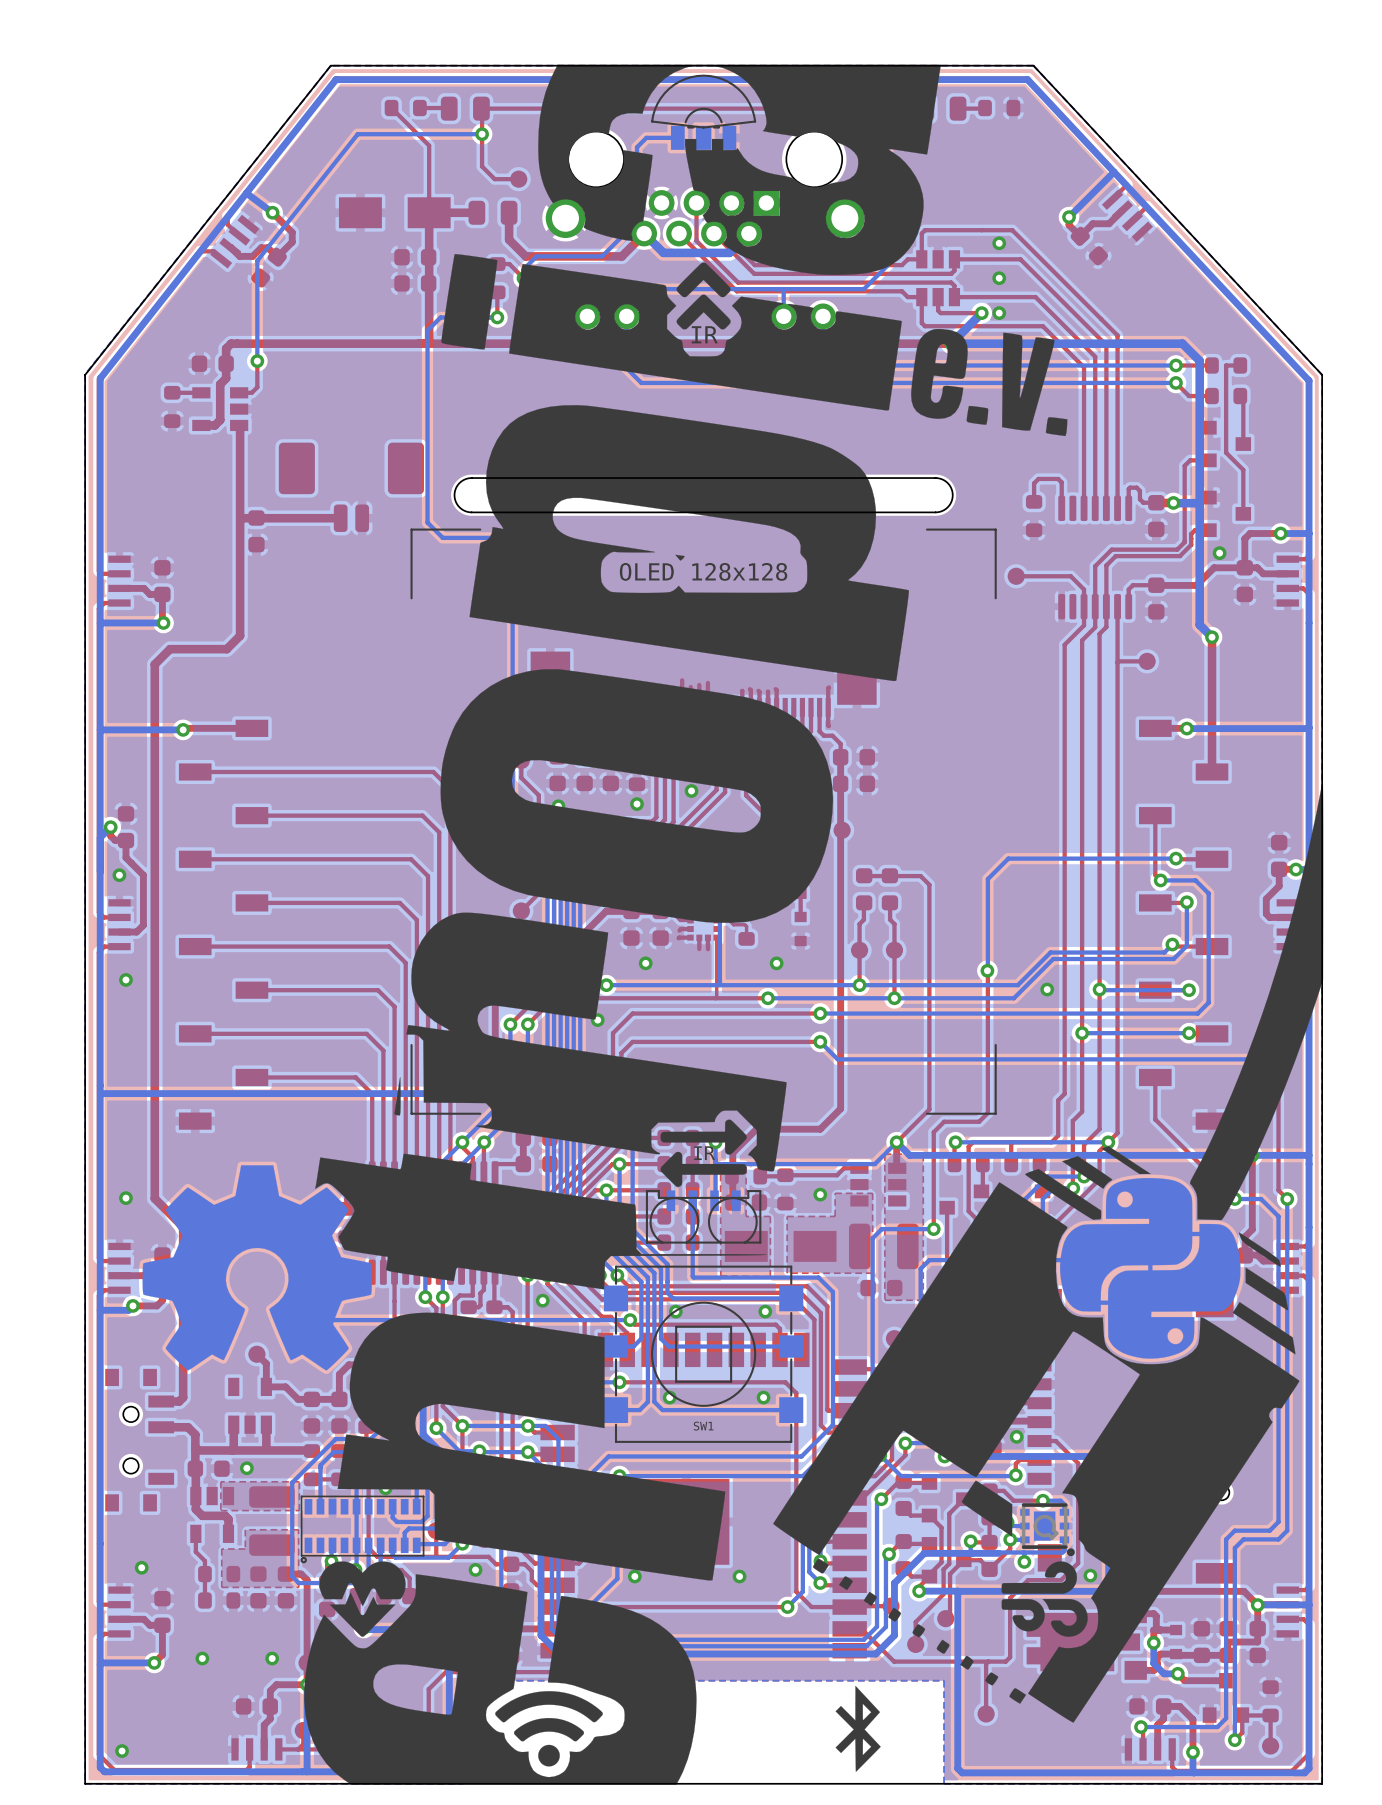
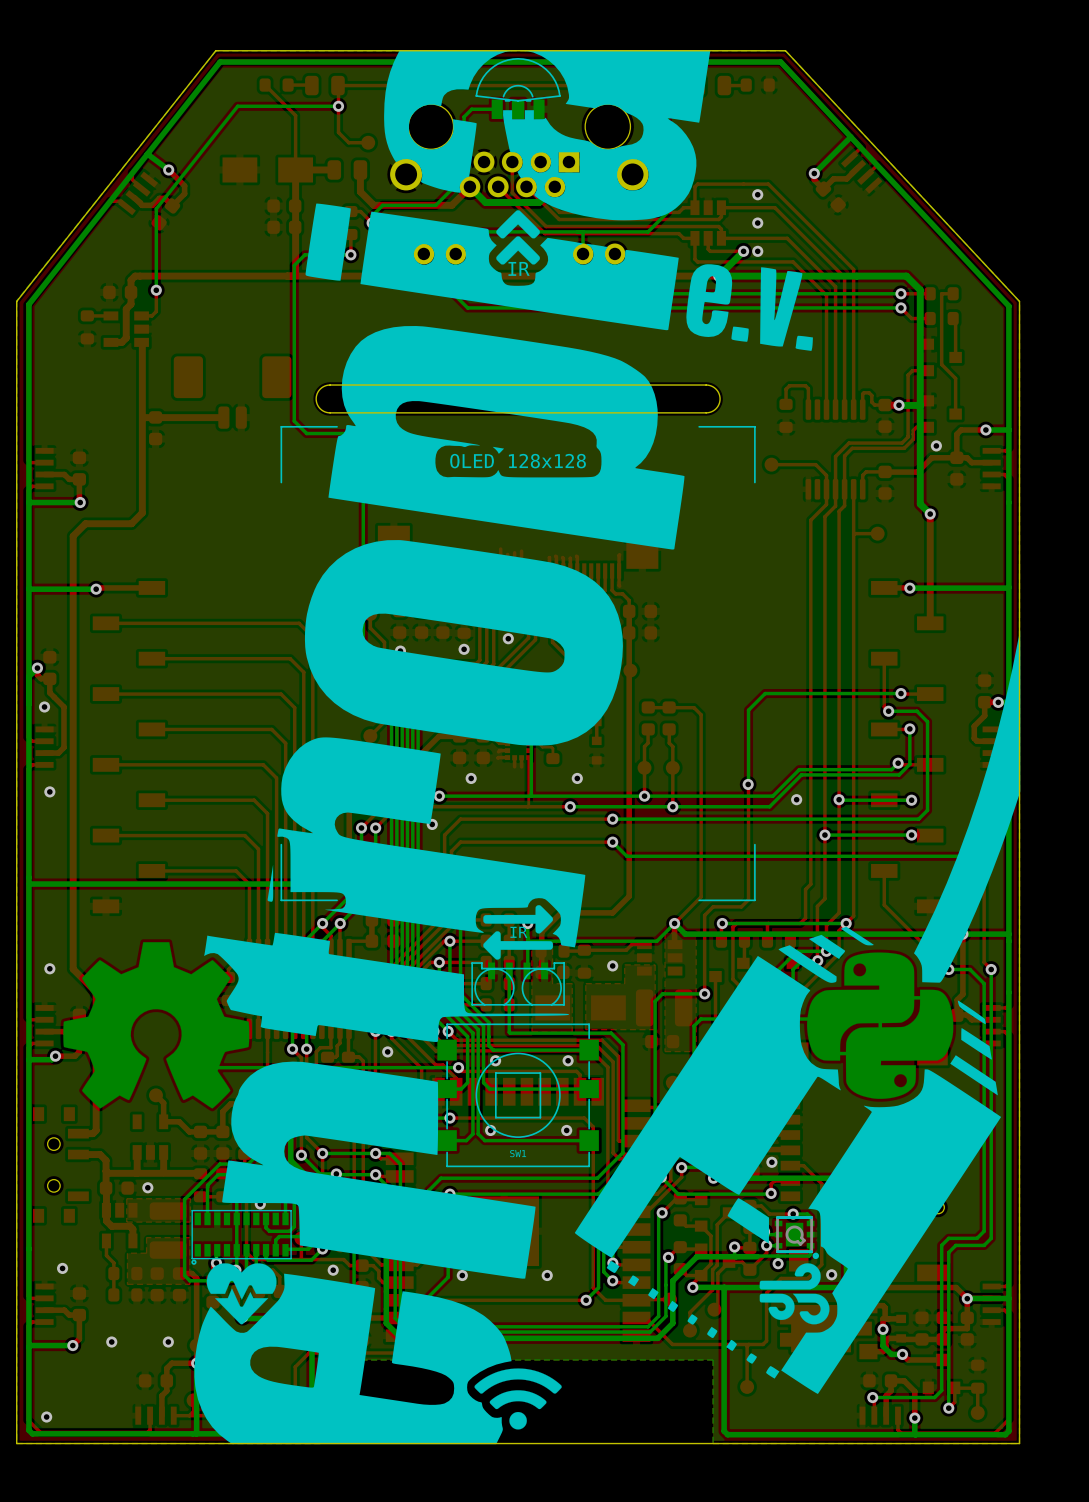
drawing shape: [304, 64, 1324, 1785] -> [194, 50, 1021, 1445]
drawing: [835, 1685, 881, 1772] -> none
drawing position: (548, 1728) -> (518, 1398)

